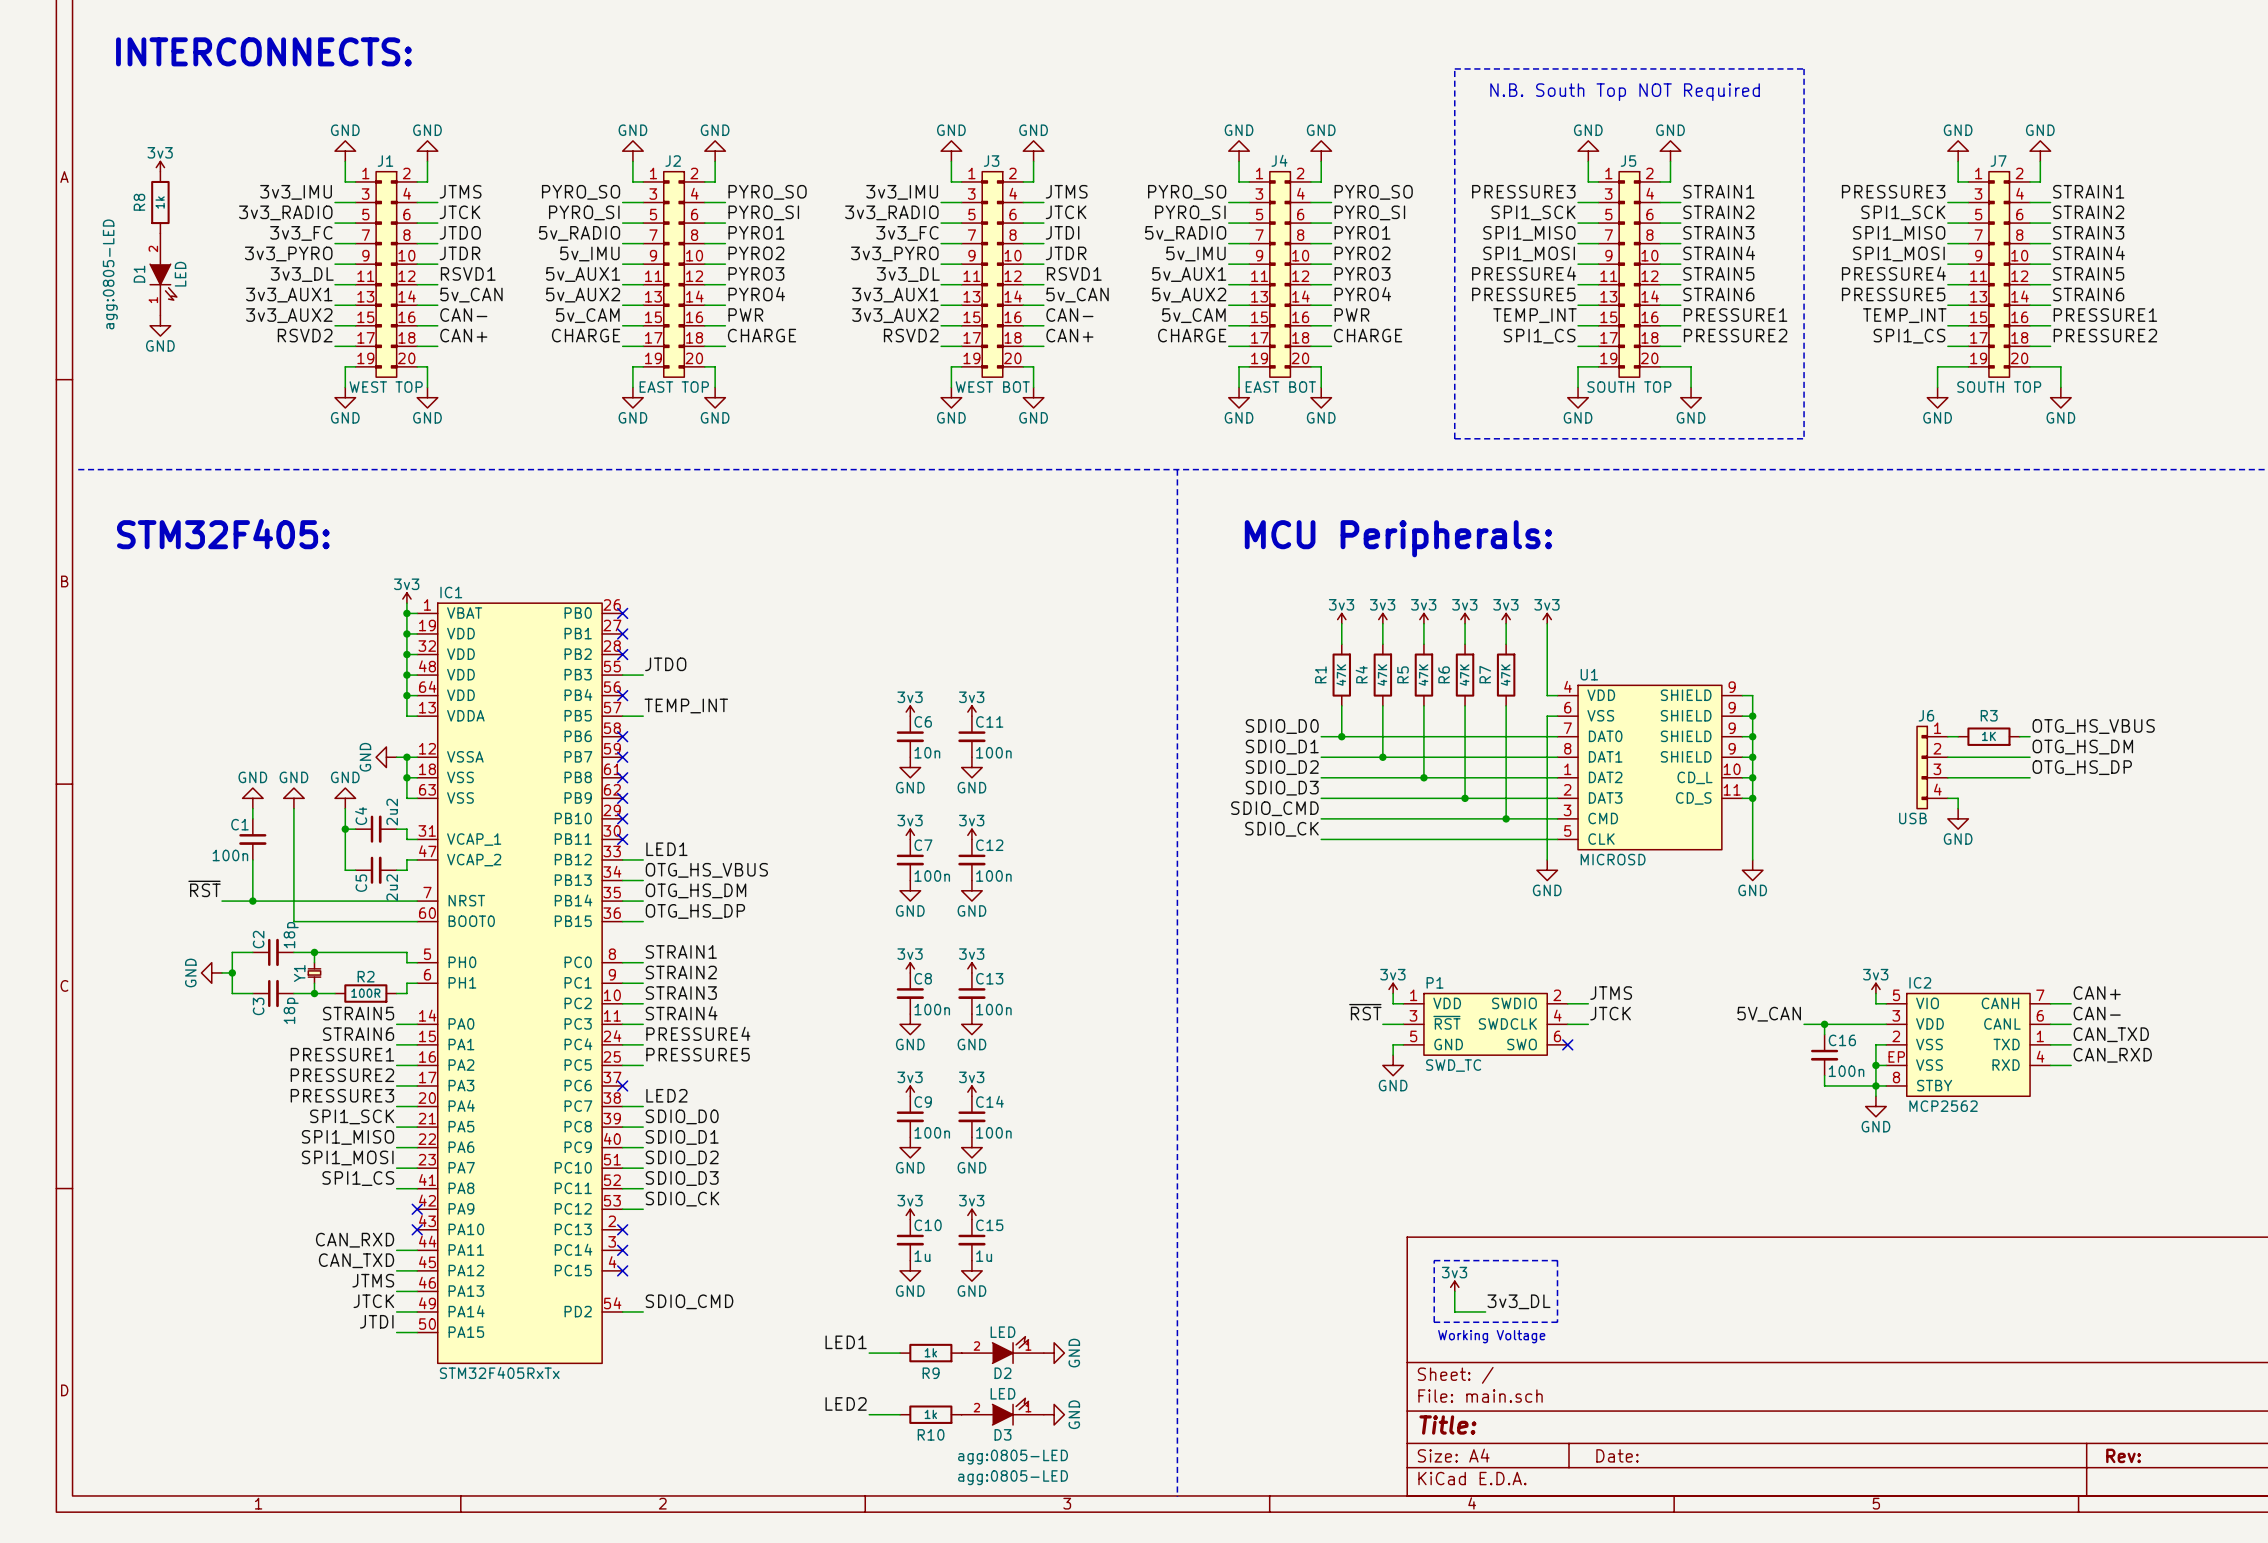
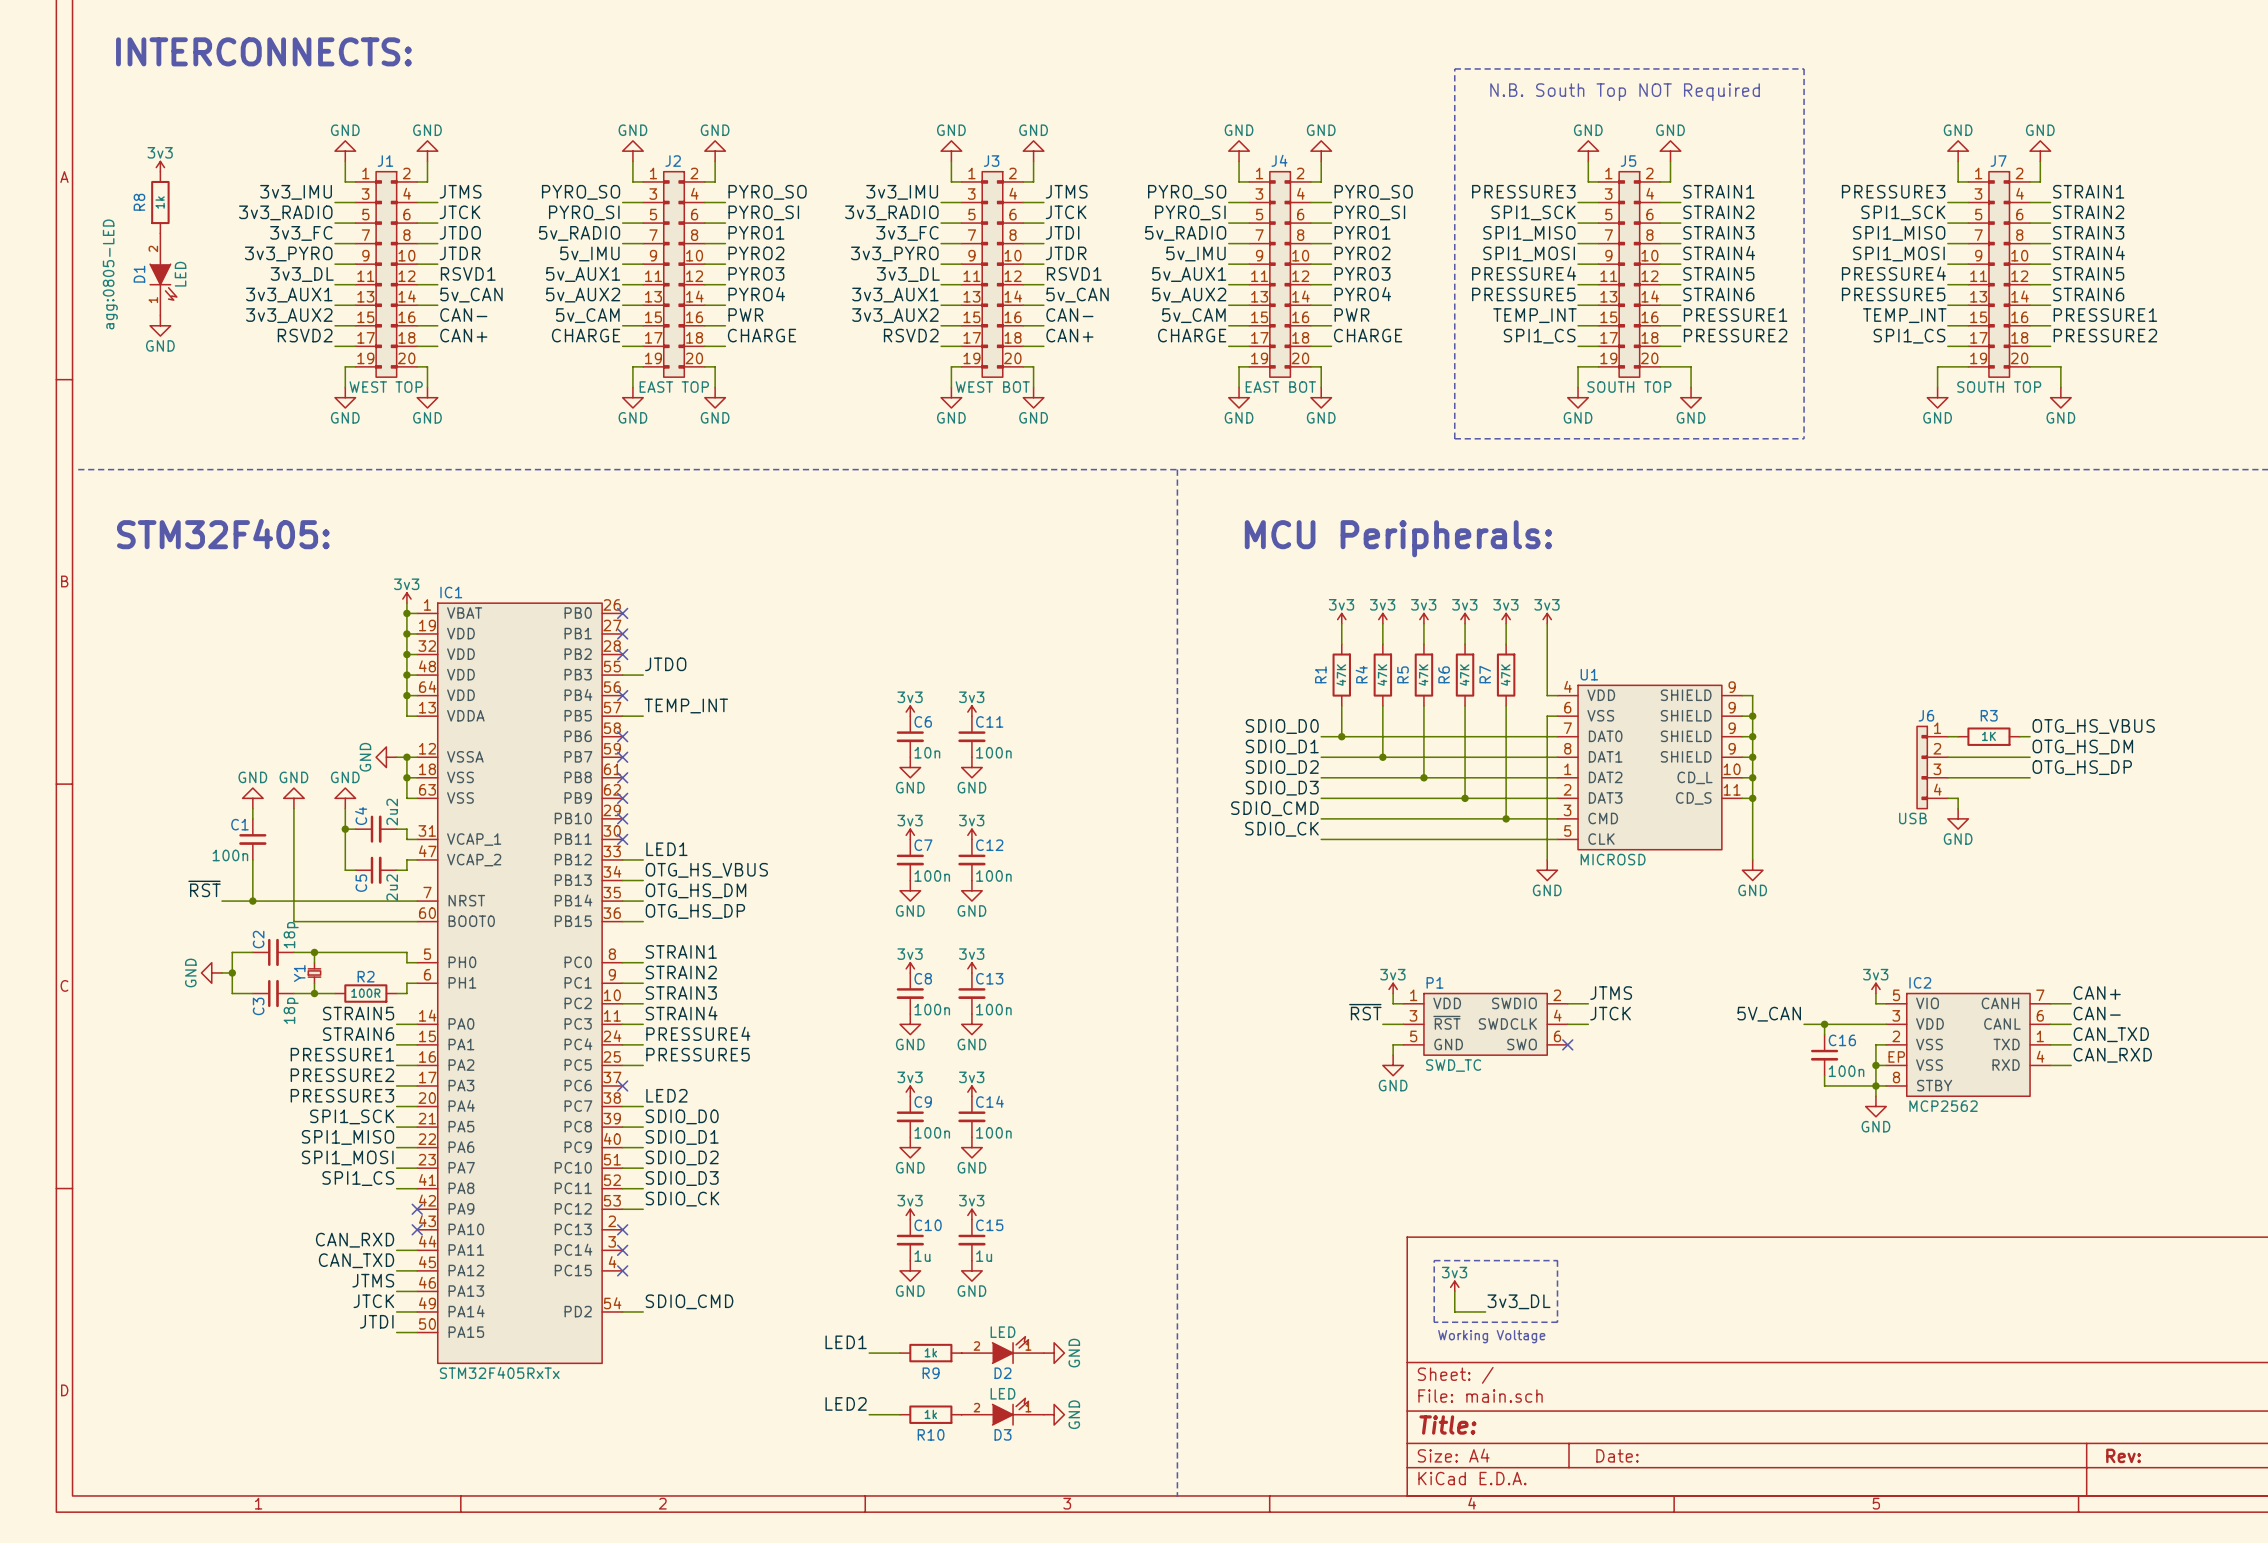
D3 text: agg:0805-LED (1013, 1457) -> none
D2 text: agg:0805-LED (1013, 1477) -> none

